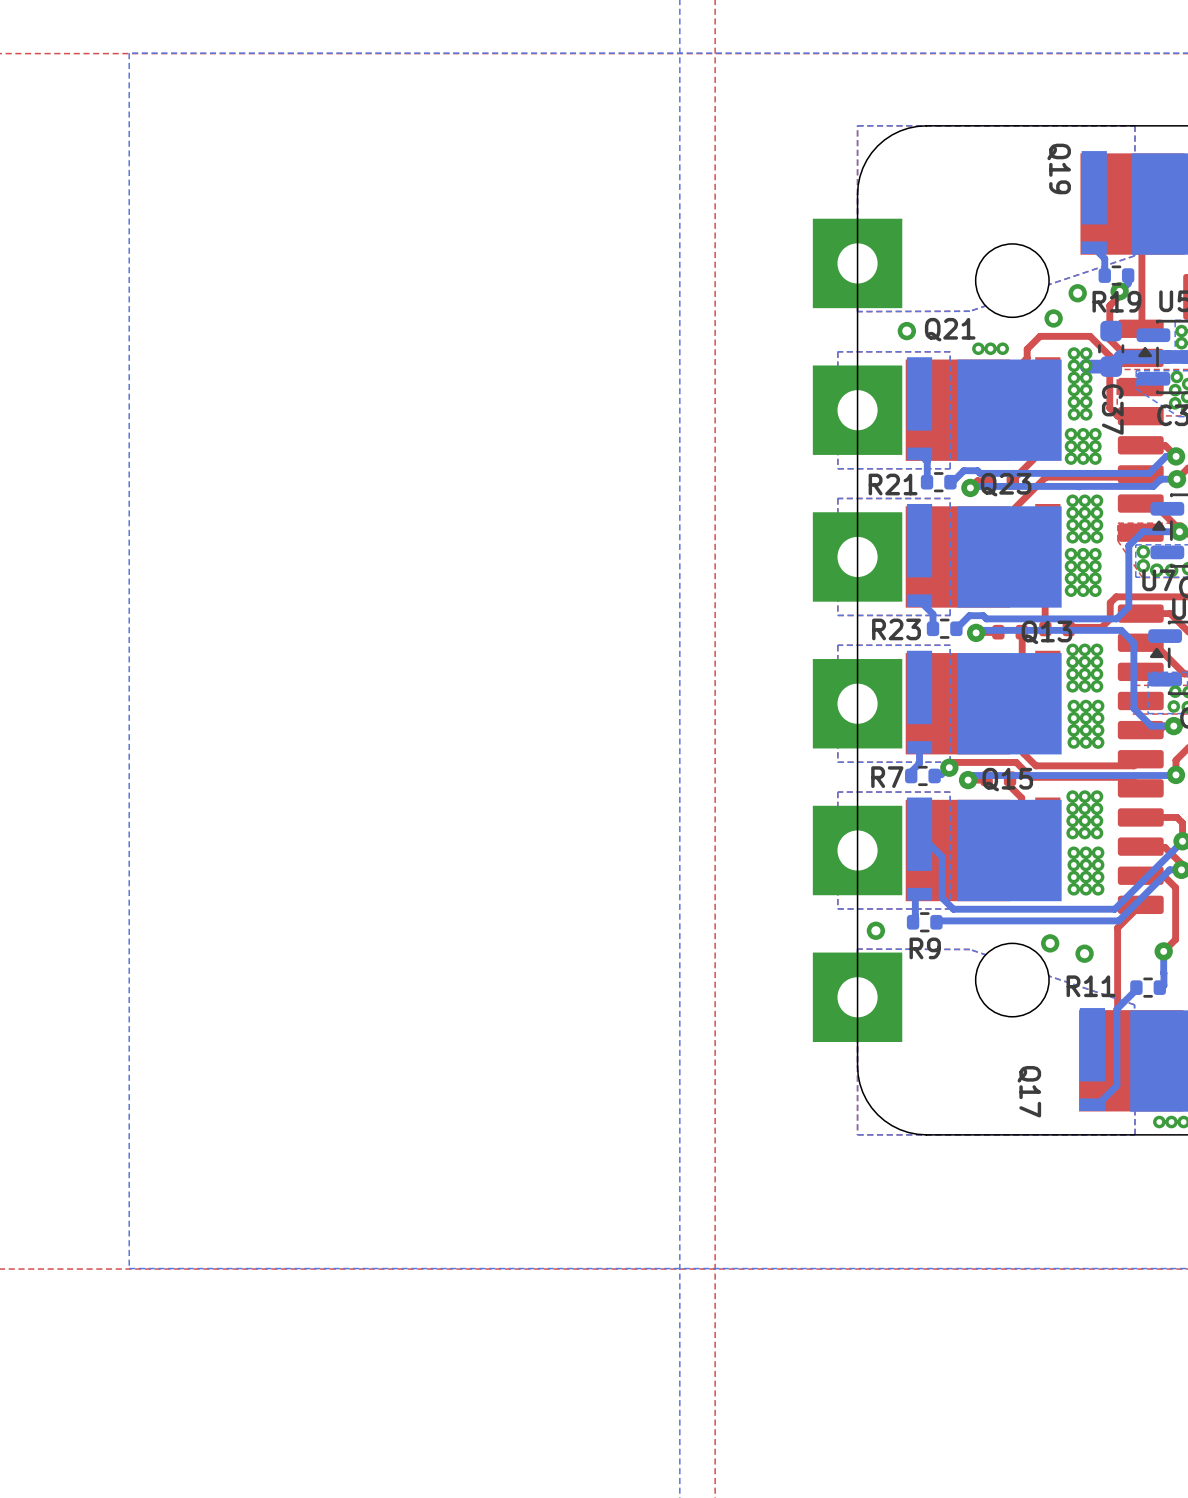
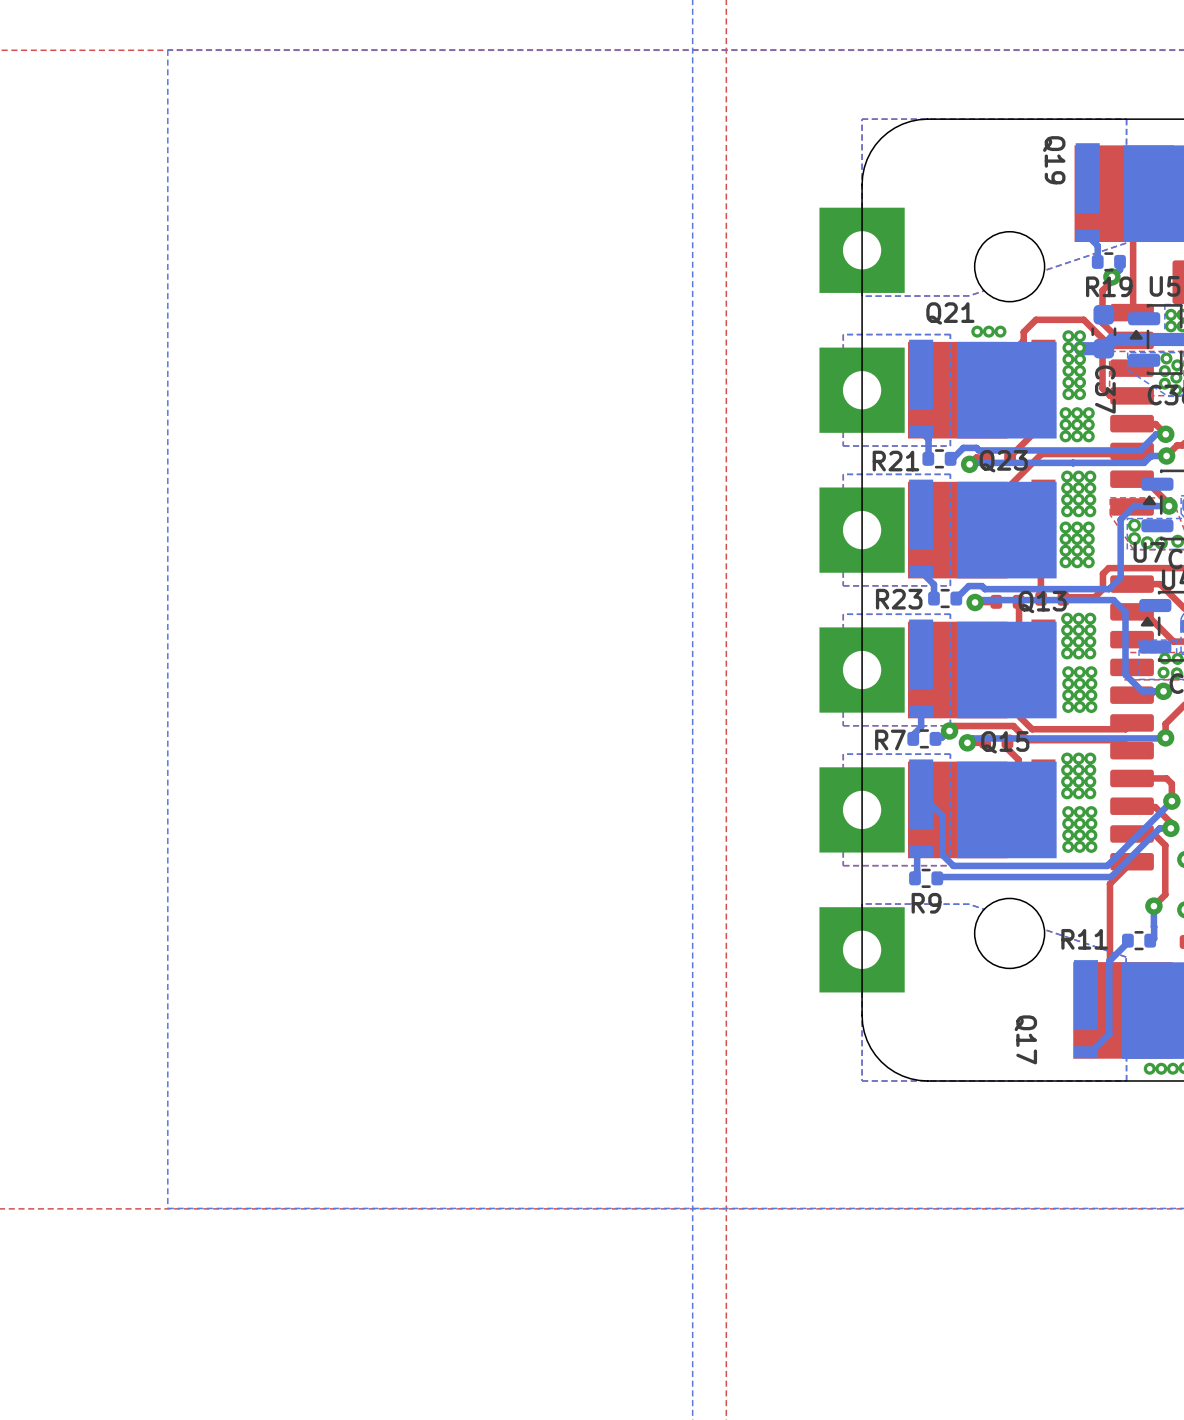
via: (1077, 293) -> none
via: (1053, 318) -> none
via: (906, 331) -> none
via: (875, 930) -> none
via: (1050, 943) -> none
via: (1084, 953) -> none

